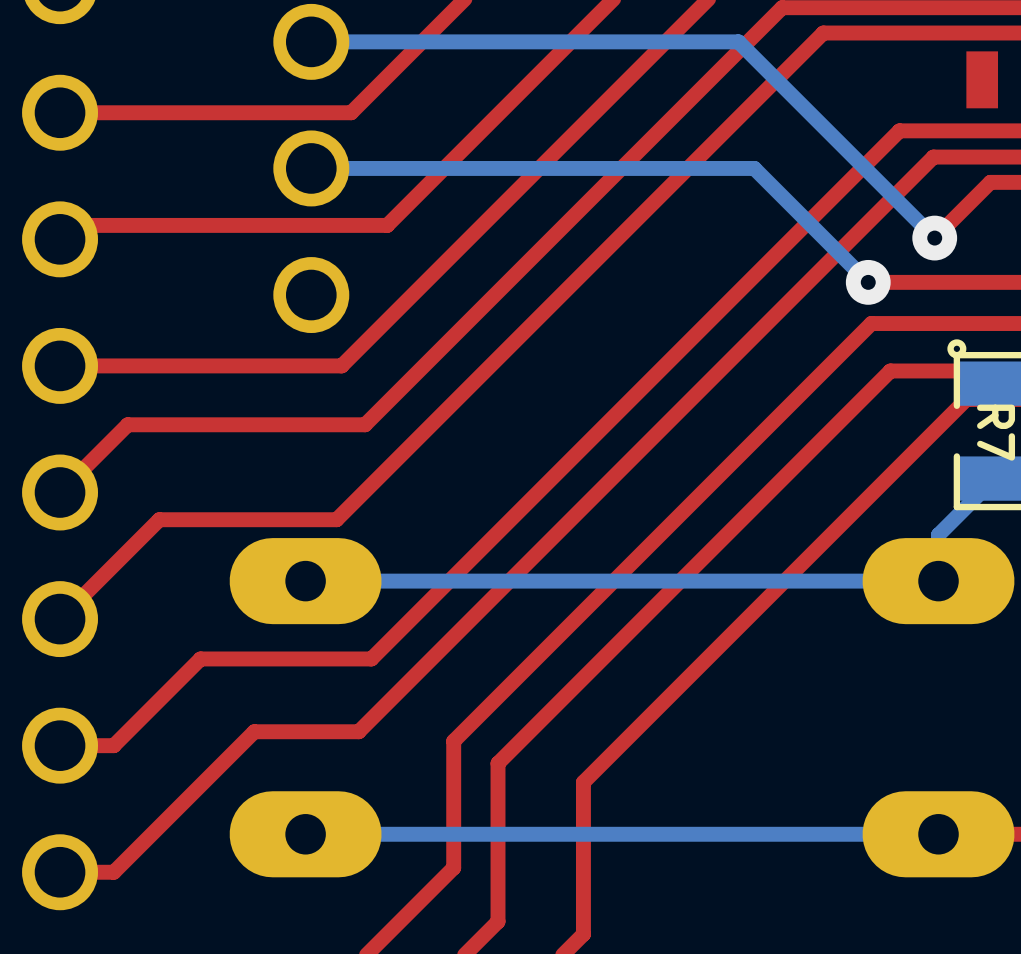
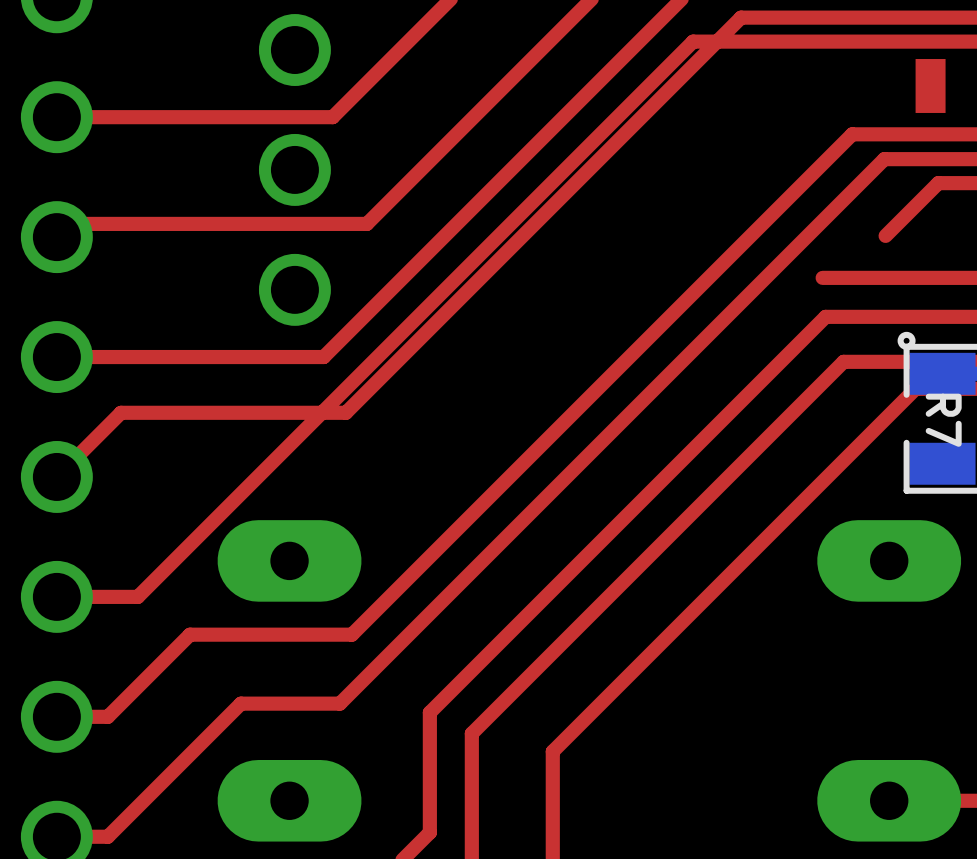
top track: (823, 33) (336, 519) (159, 519) (60, 619) -> (780, 41) (693, 41) (137, 596) (56, 596)
bottom track: (311, 41) (738, 41) (934, 238) -> none
bottom track: (311, 168) (754, 168) (868, 282) -> none
via: (934, 238) -> none
via: (868, 282) -> none
bottom track: (994, 478) (938, 534) (938, 581) (305, 581) -> none
bottom track: (938, 834) (305, 834) -> none

